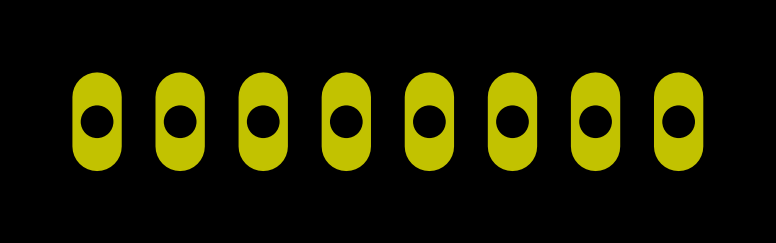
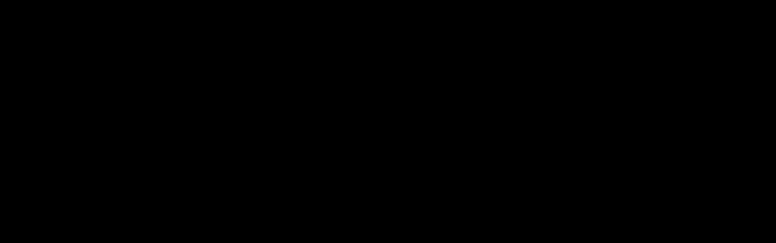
part: (387, 121) -> none

